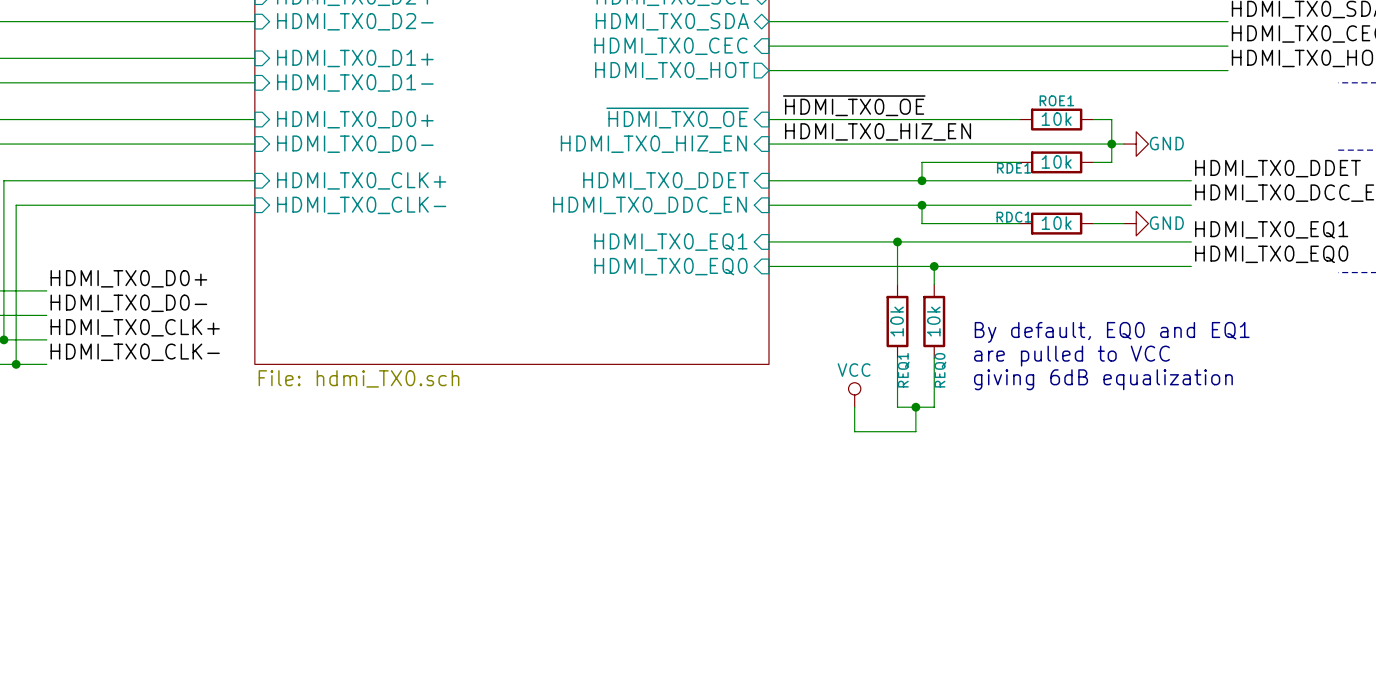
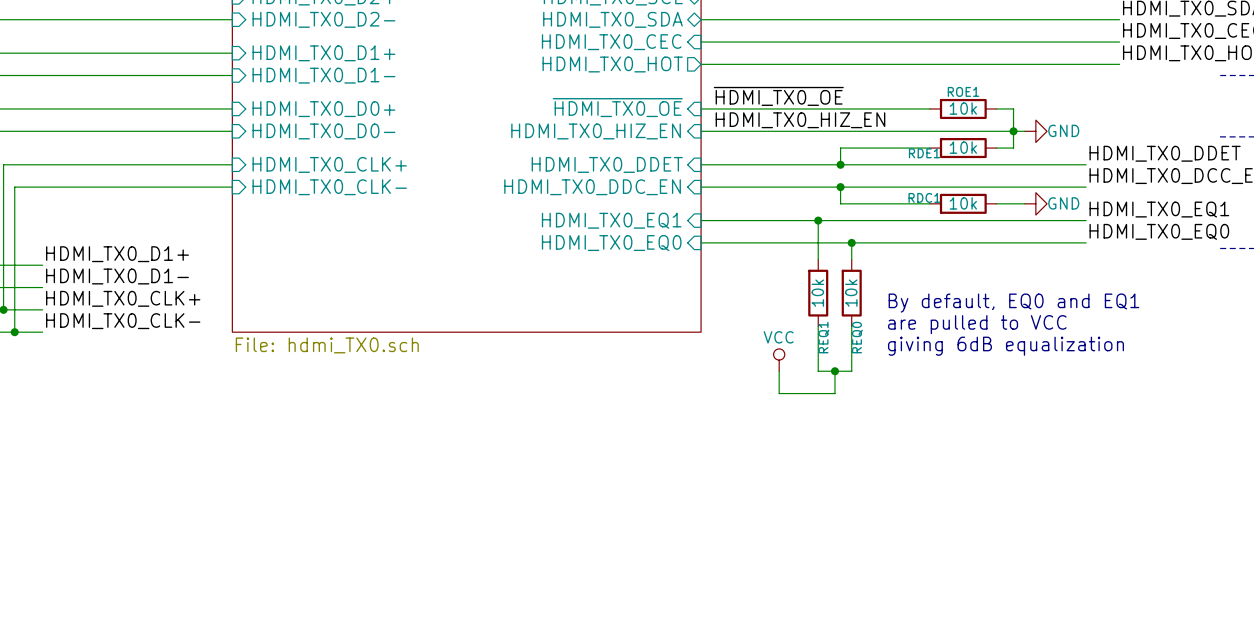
label: HDMI_TX0_D0+ (128, 278) -> HDMI_TX0_D1+ (117, 254)
label: HDMI_TX0_D0- (128, 303) -> HDMI_TX0_D1- (117, 276)

